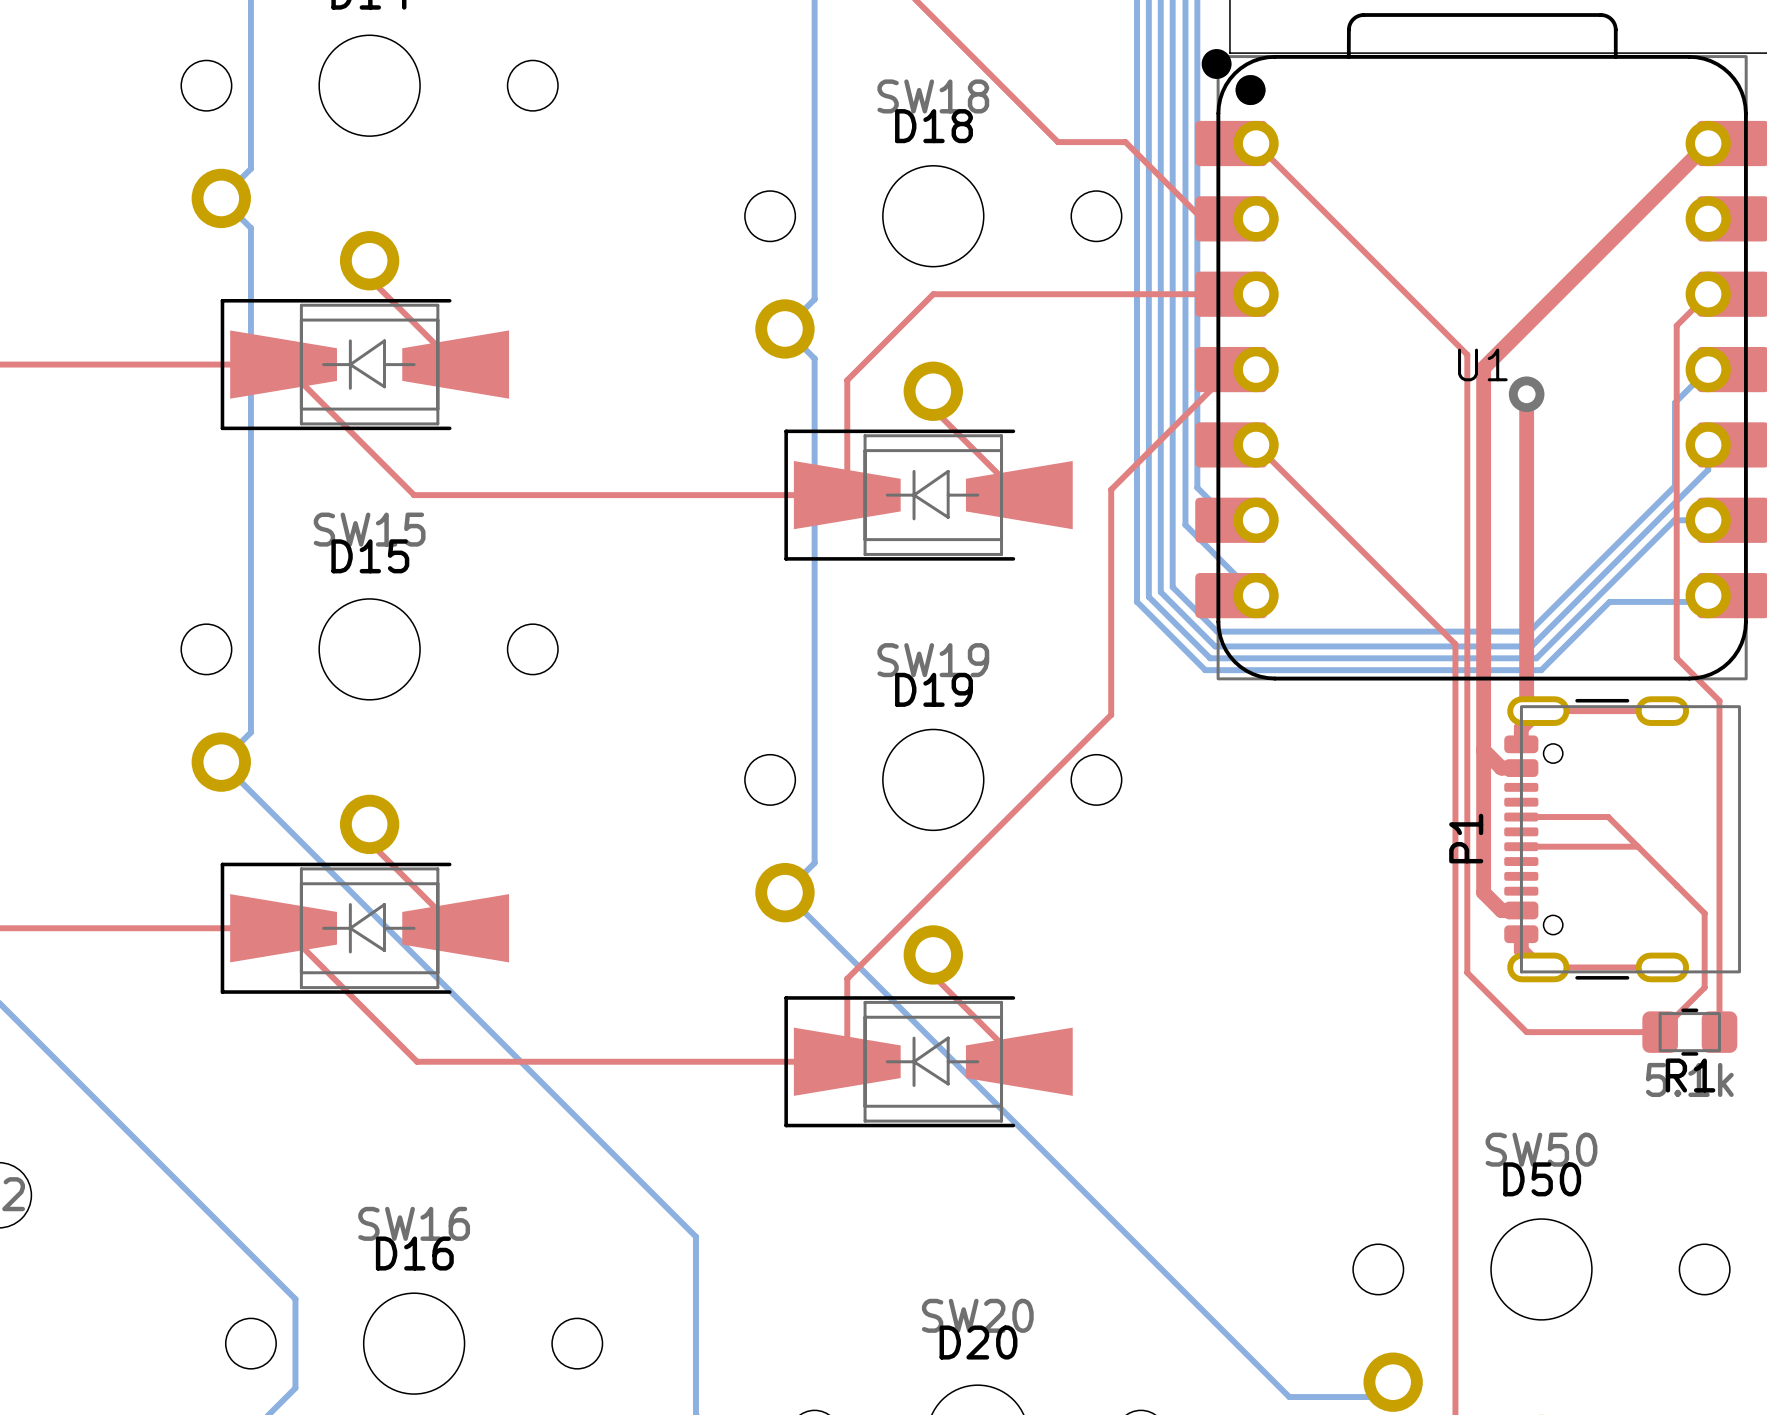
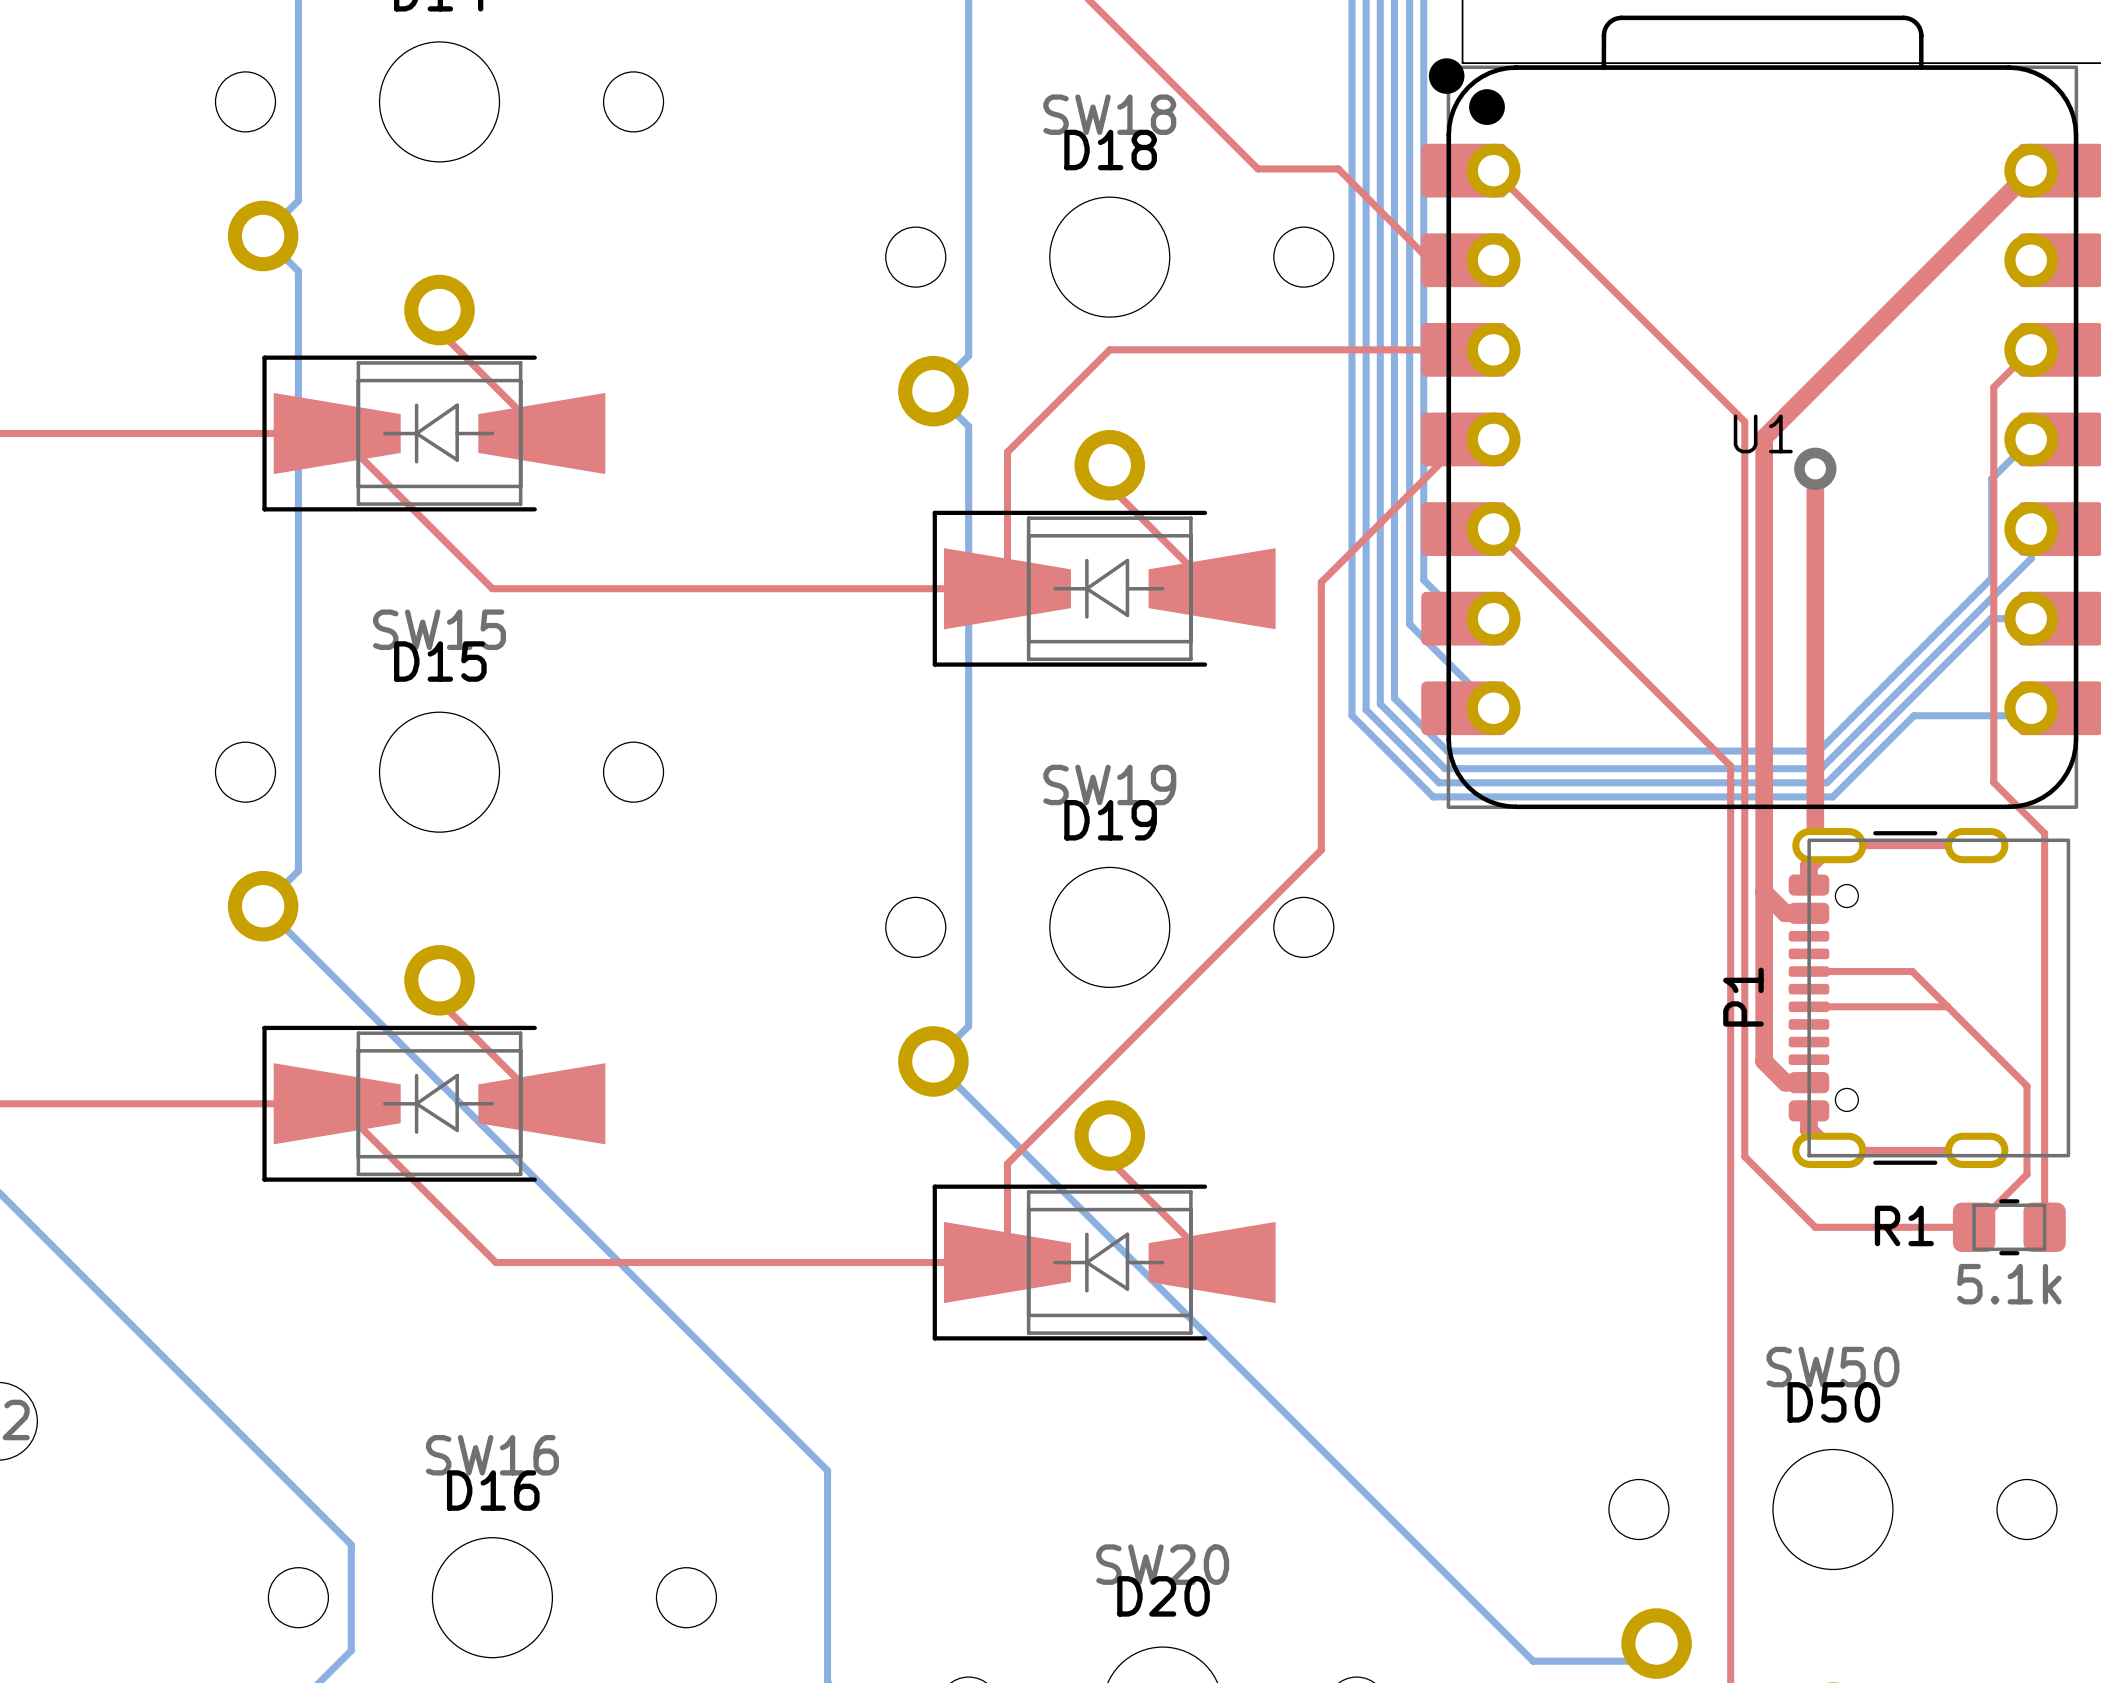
R1 name position: R1 (1690, 1075) -> R1 (1904, 1225)

